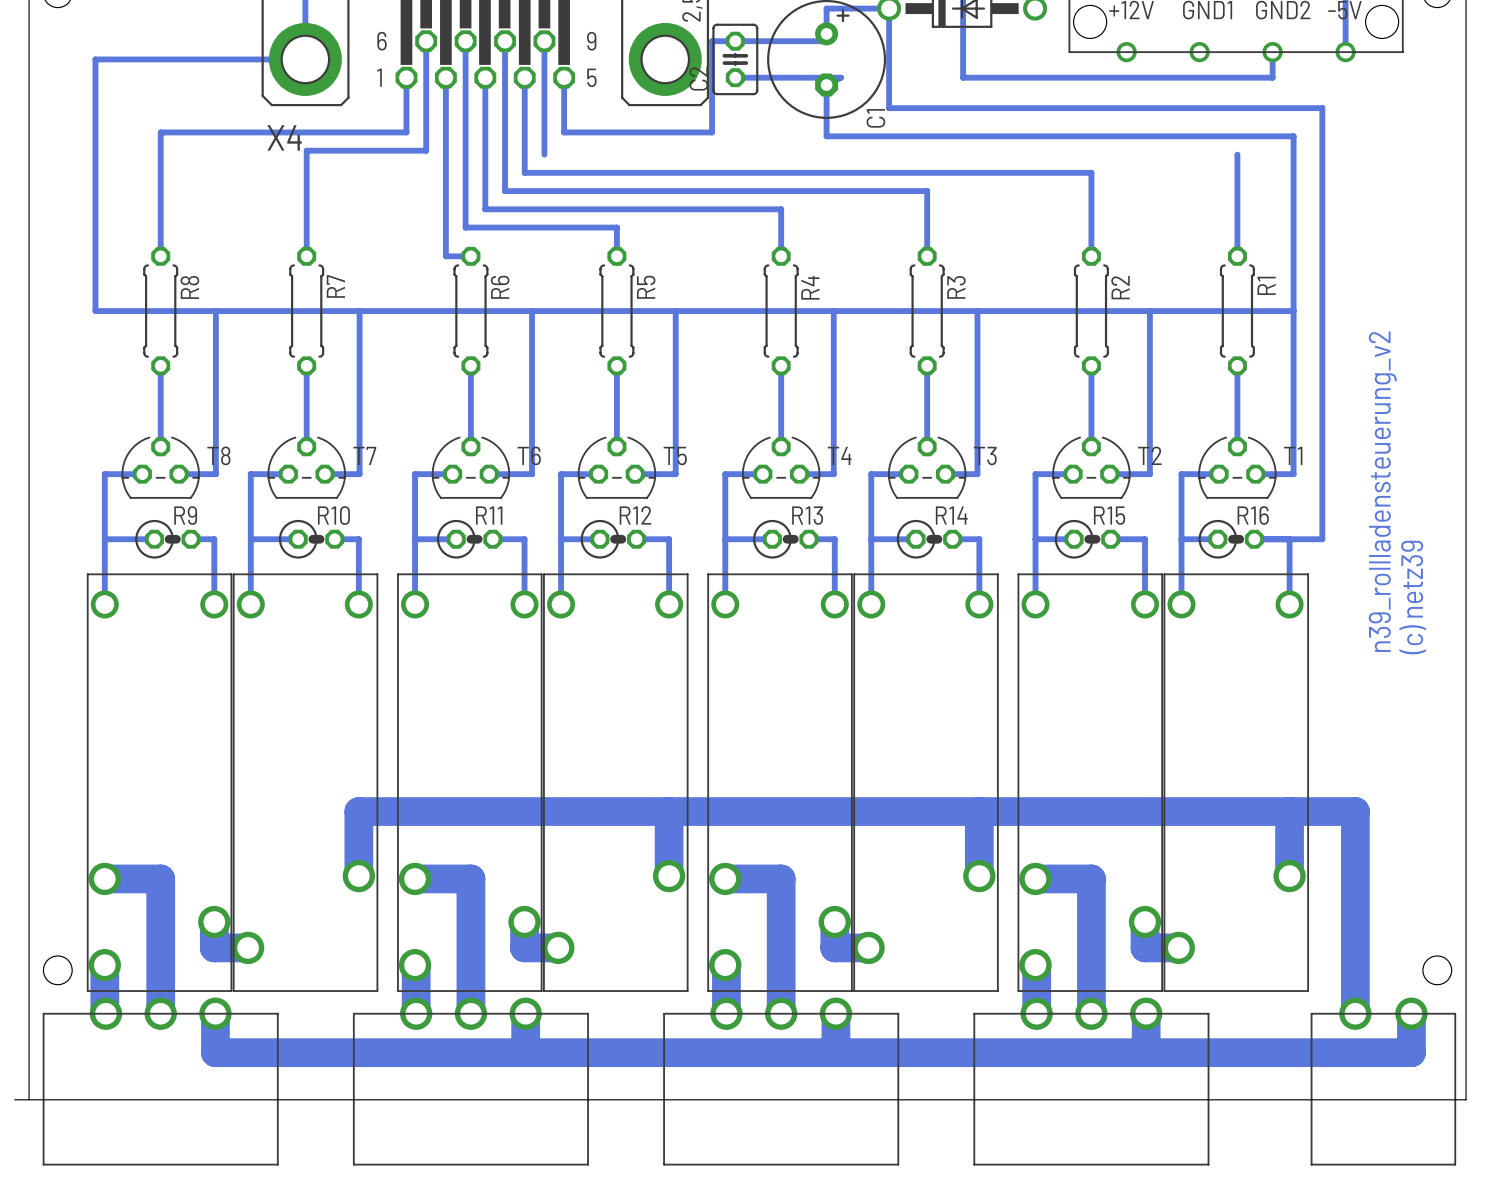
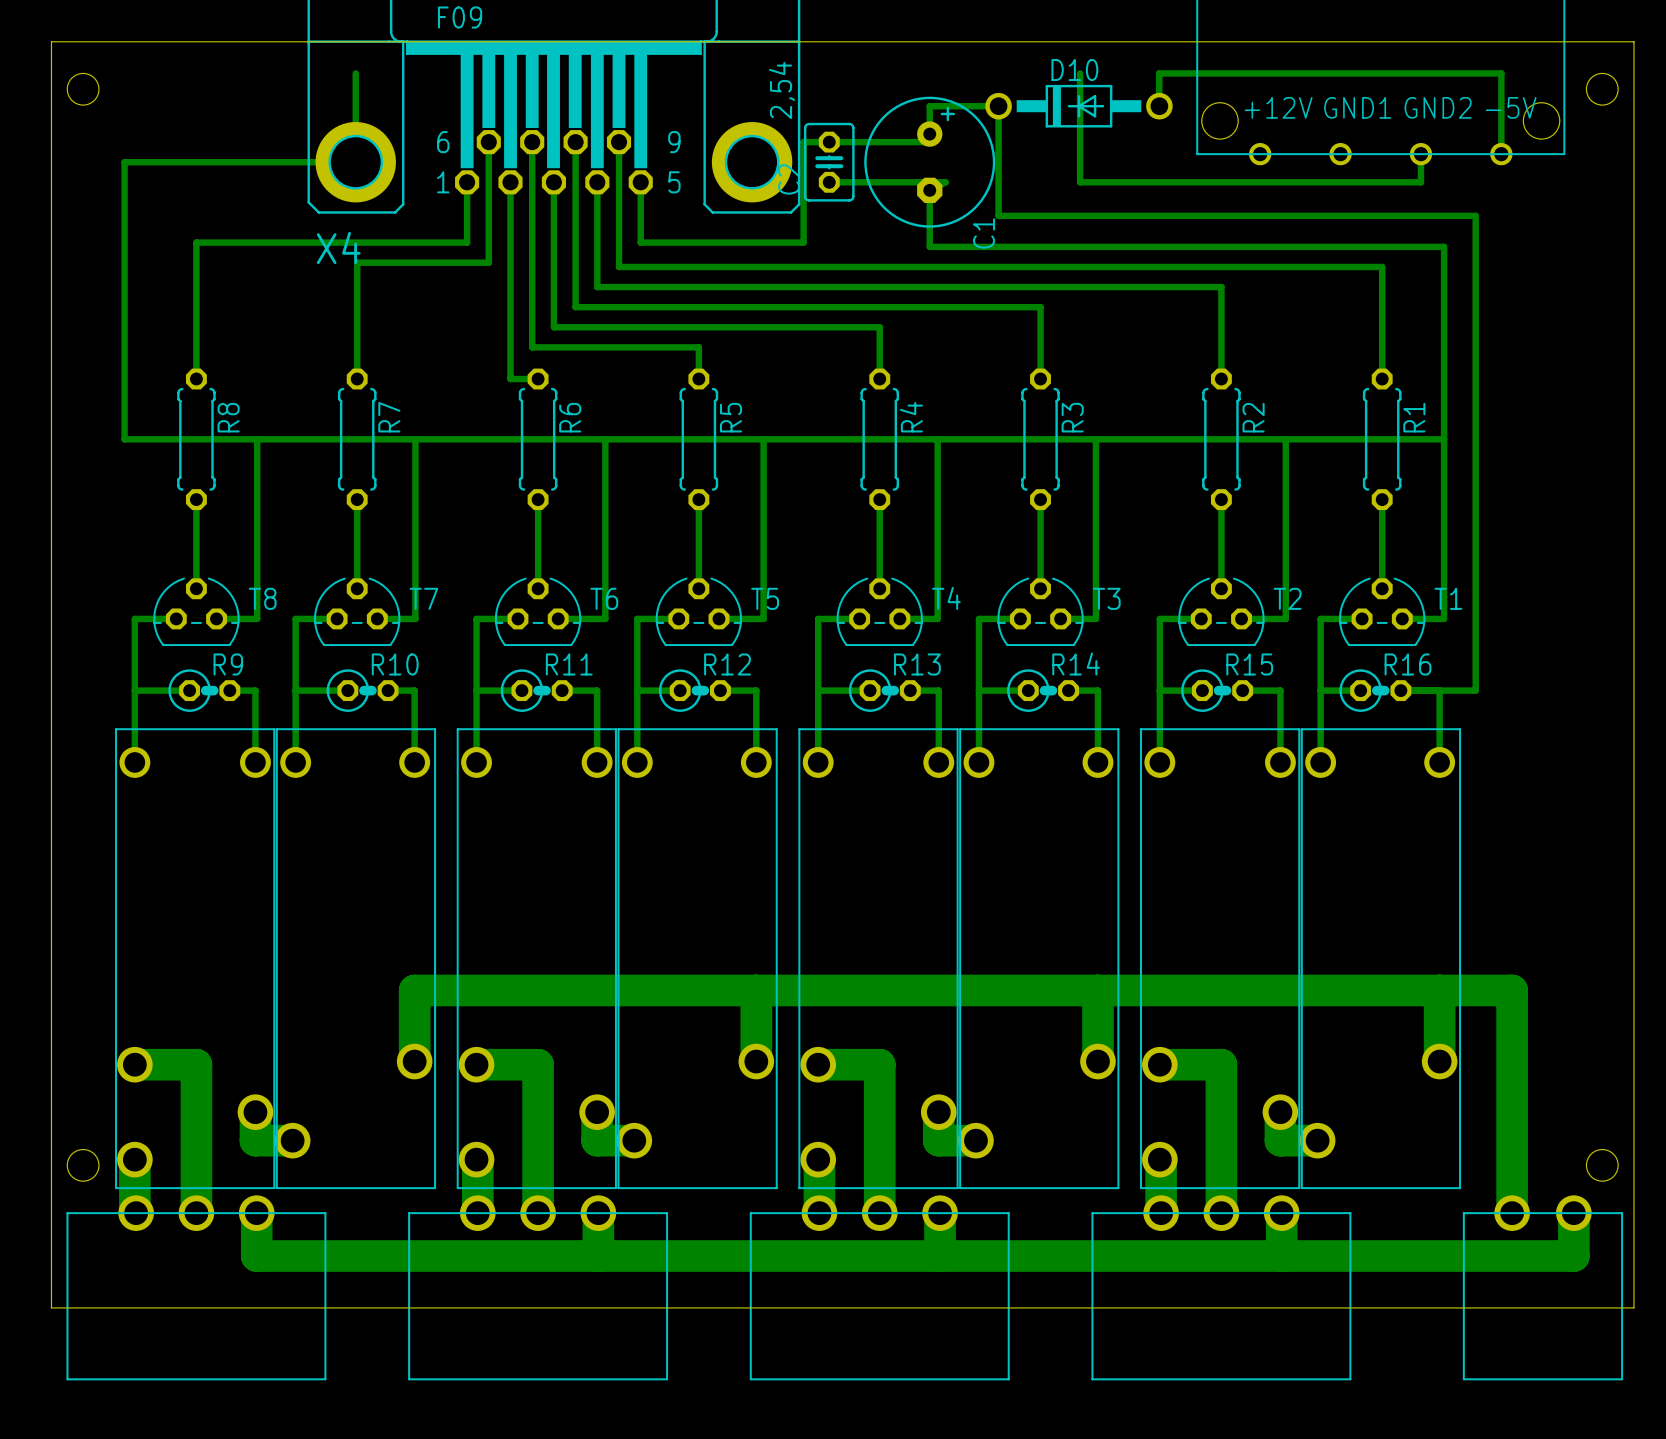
bottom track: none -> (619, 266) (1382, 266)
text: n39_rollladensteuerung_v2 (1382, 491) -> none
text: (c) netz39 (1412, 597) -> none
board edge: (14, 1099) (29, 1099) -> none

